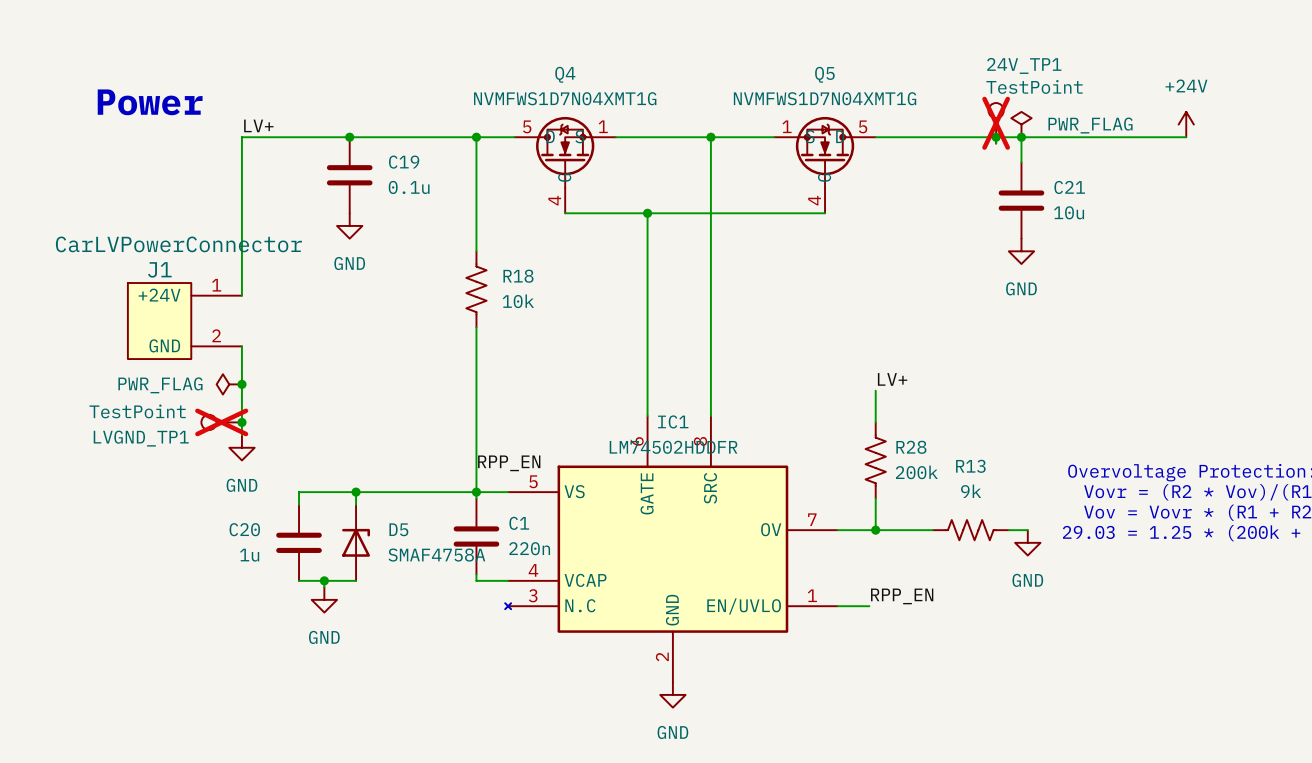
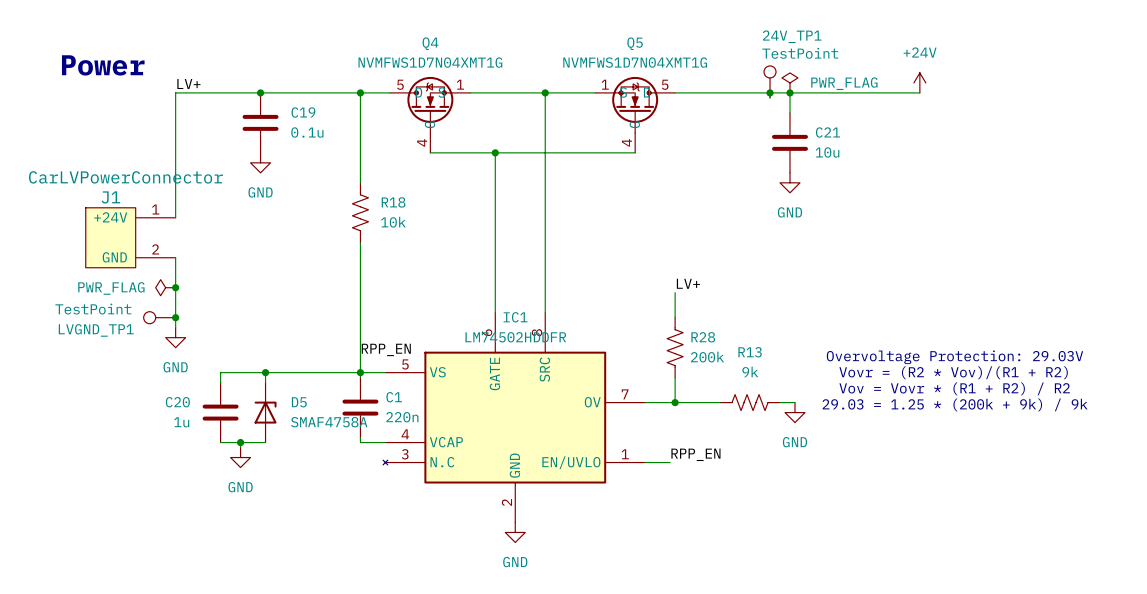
24V_TP1 do-not-place cross: (996, 123) -> none
LVGND_TP1 do-not-place cross: (221, 422) -> none

